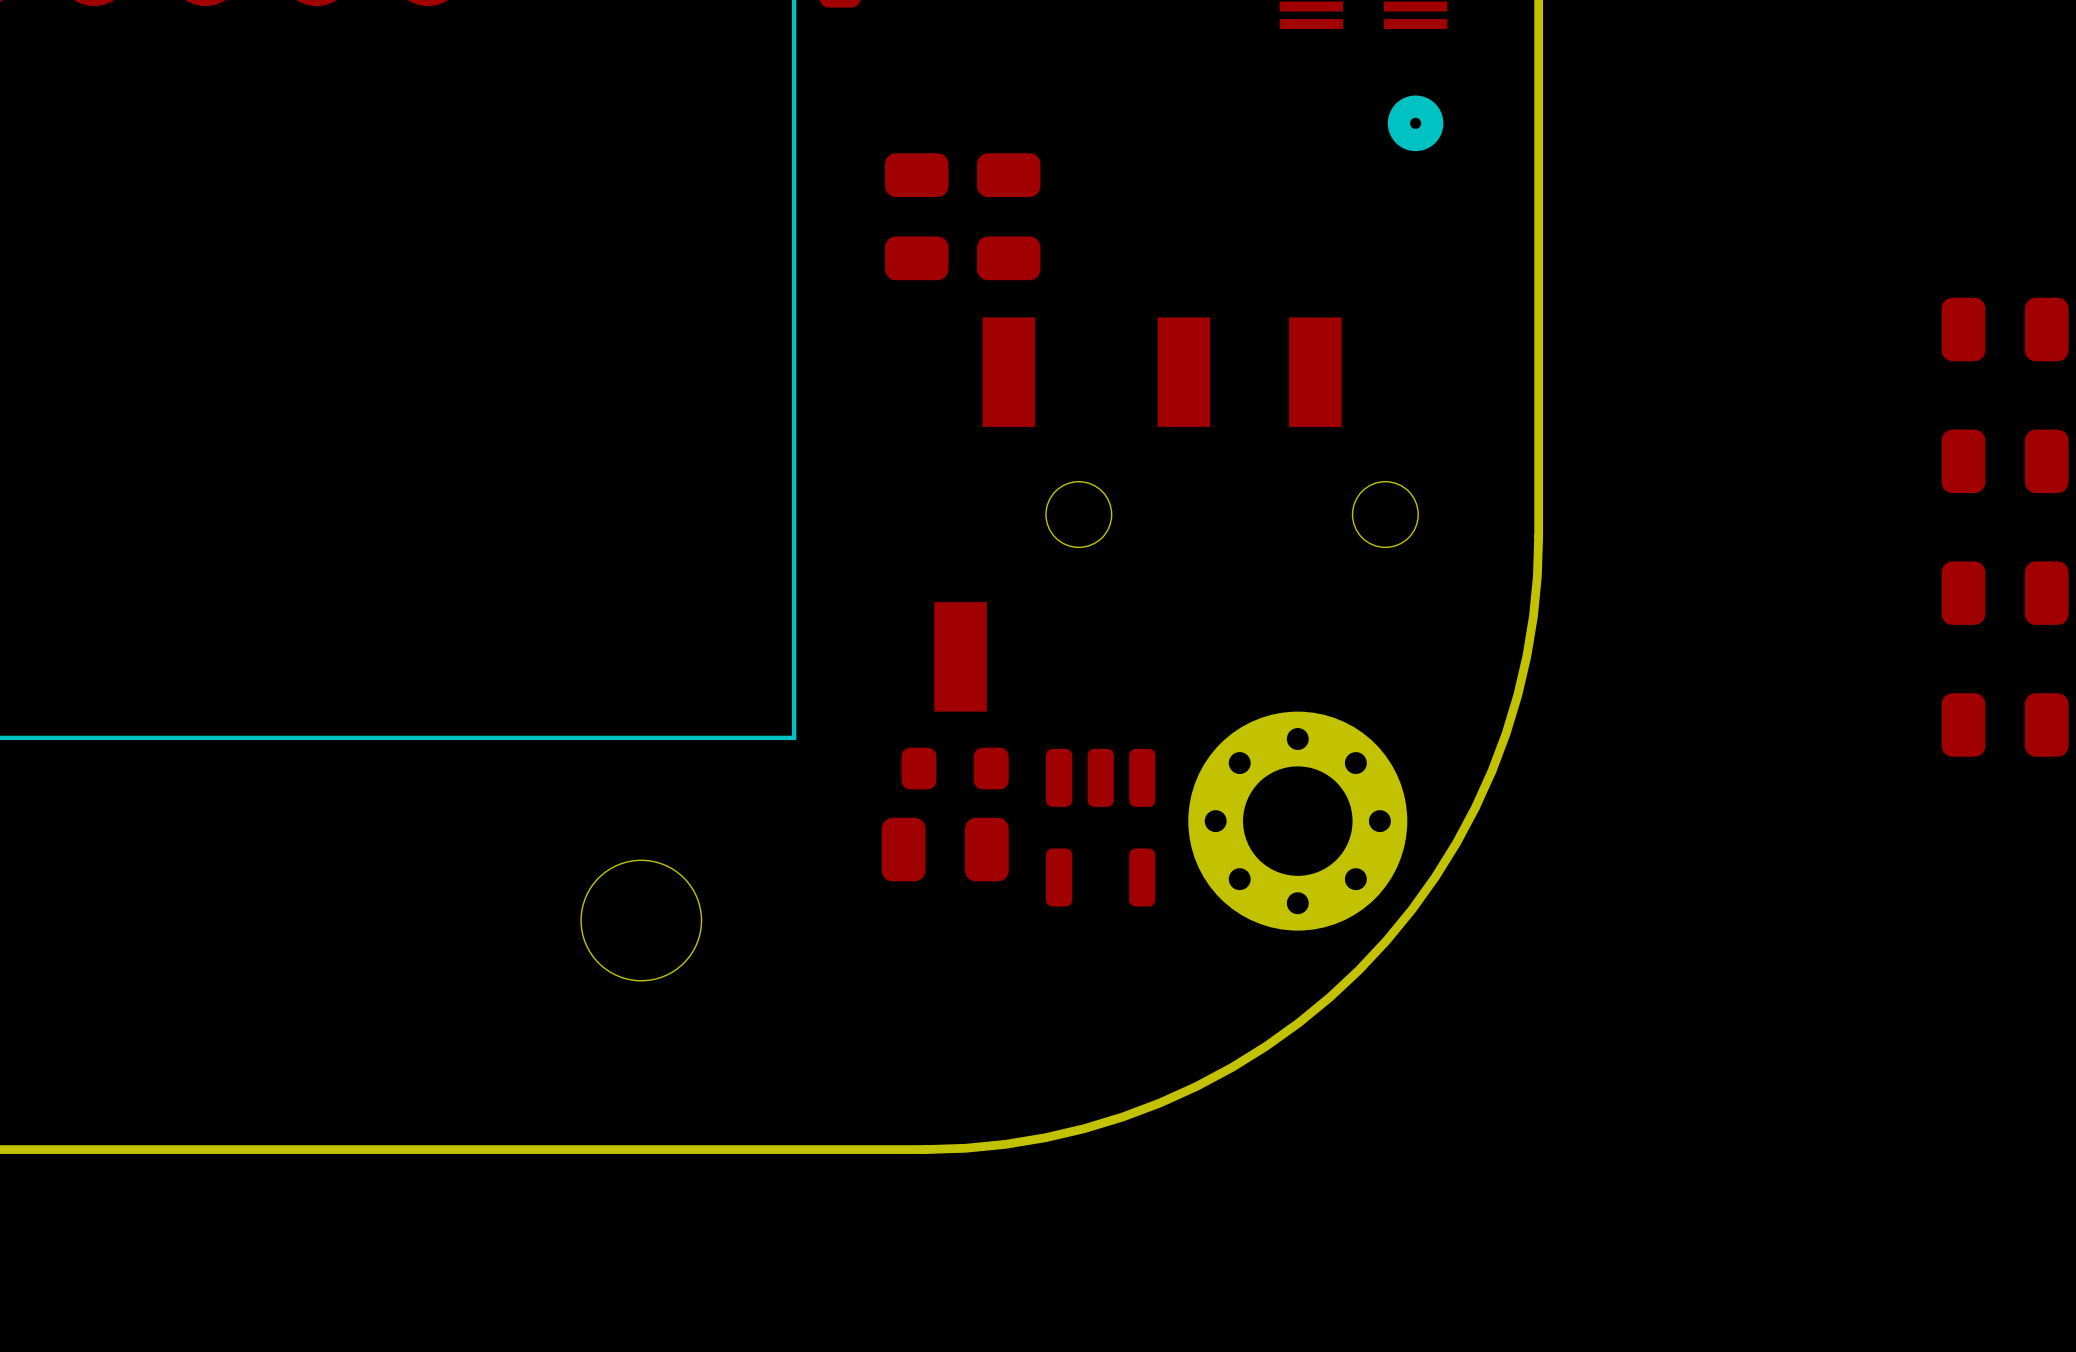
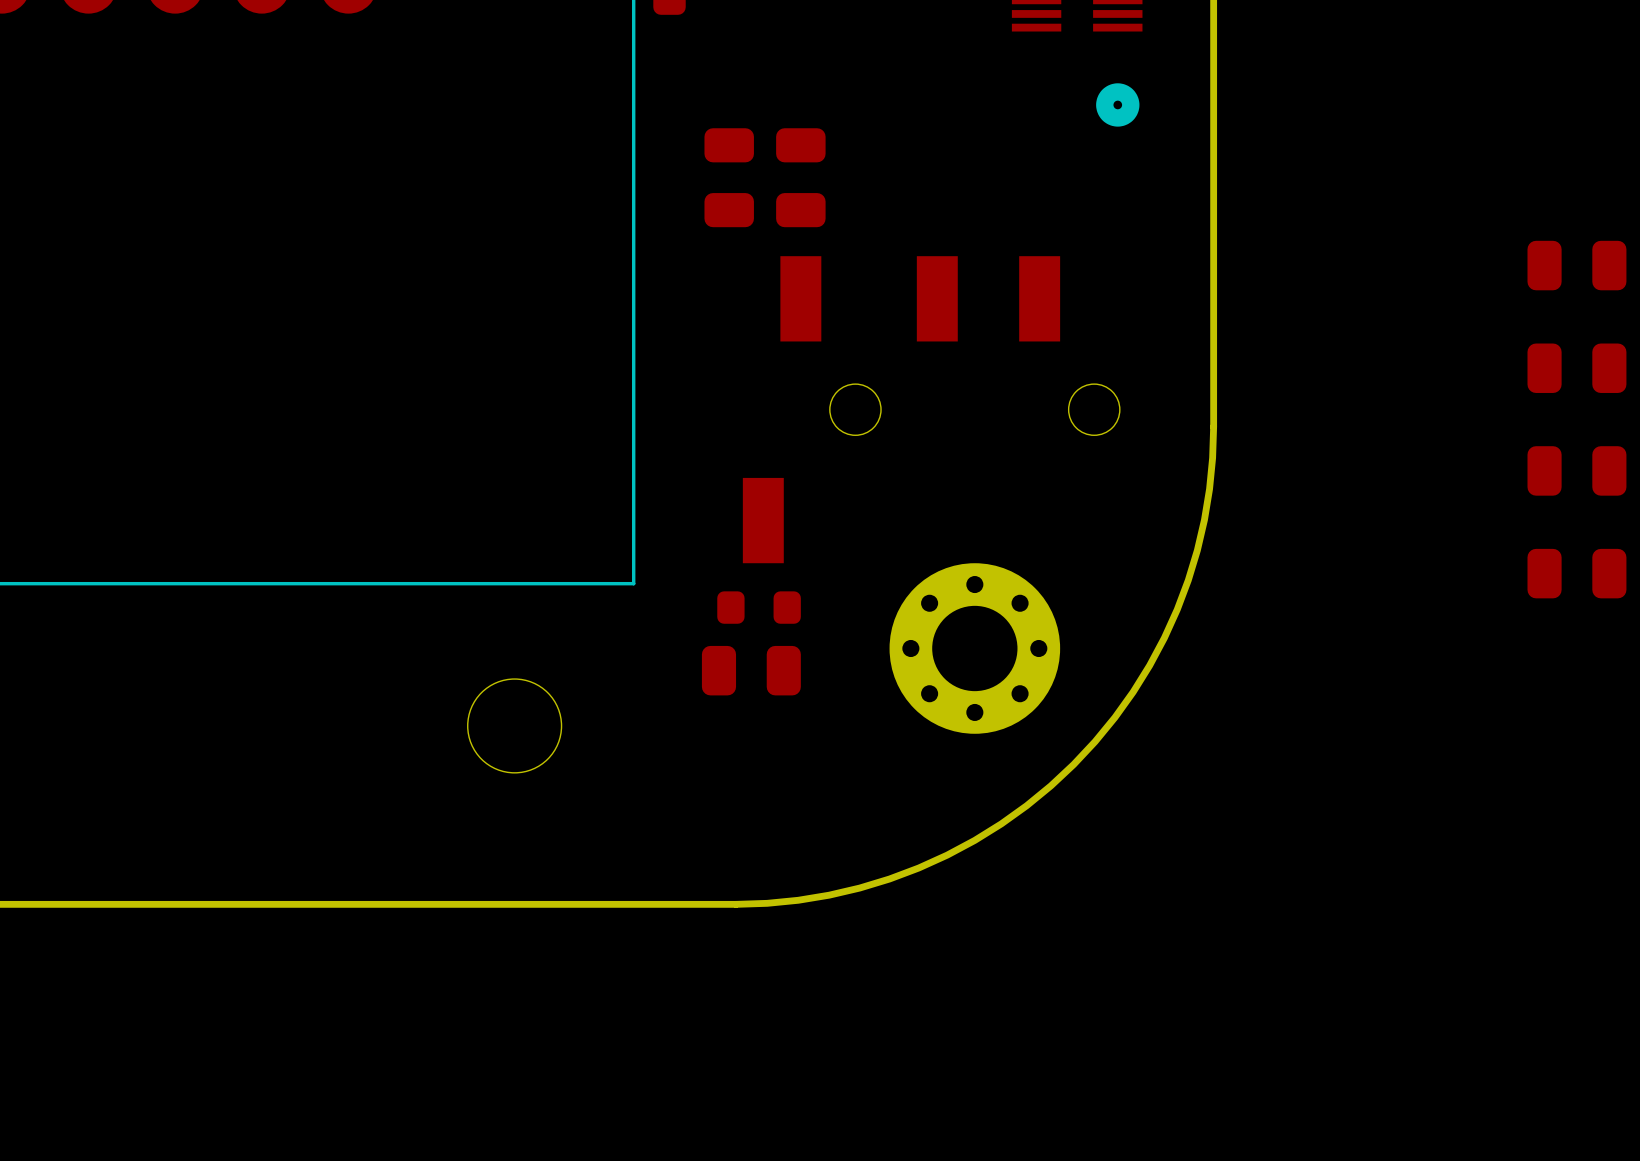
part position: (1297, 821) -> (974, 648)
part: (1100, 827) -> none

